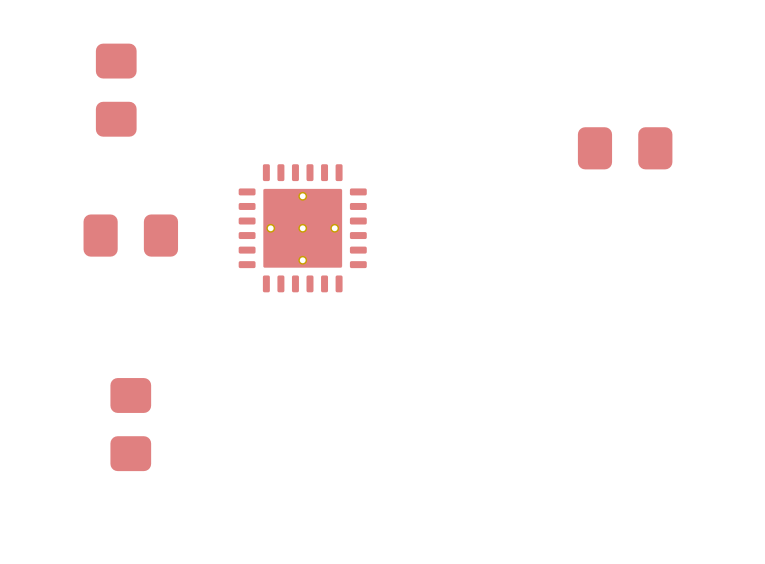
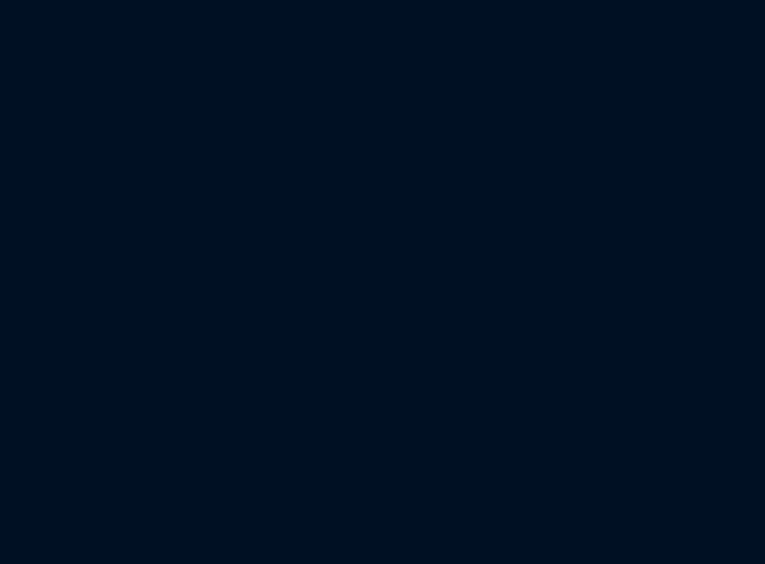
part: (116, 90) -> none
part: (625, 148) -> none
part: (302, 228) -> none
part: (130, 235) -> none
part: (130, 424) -> none

